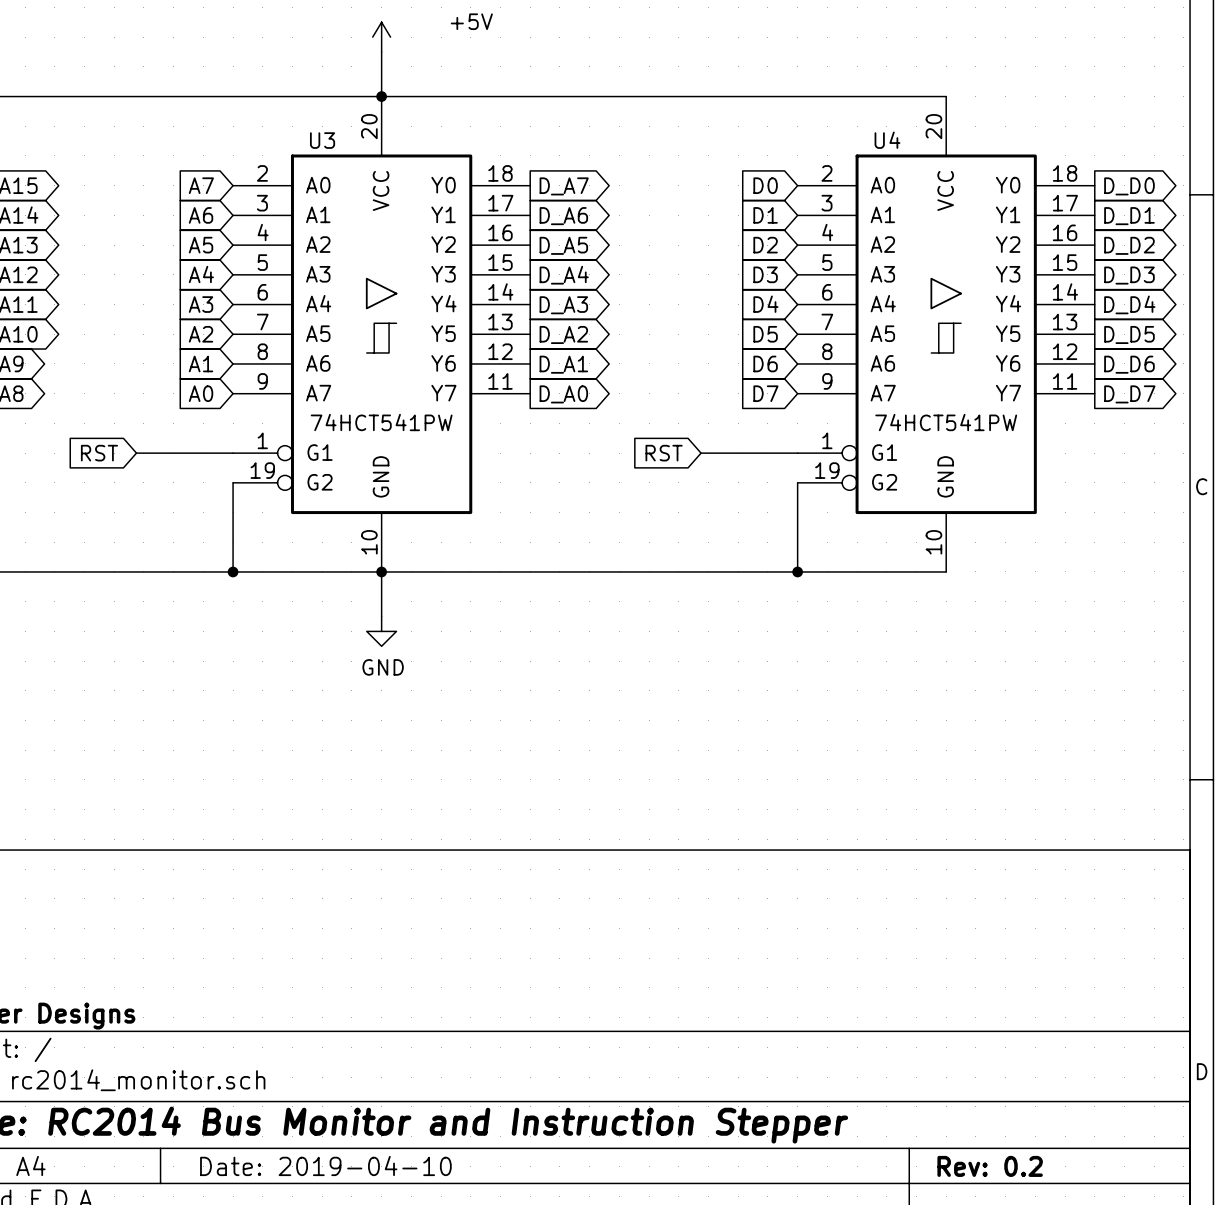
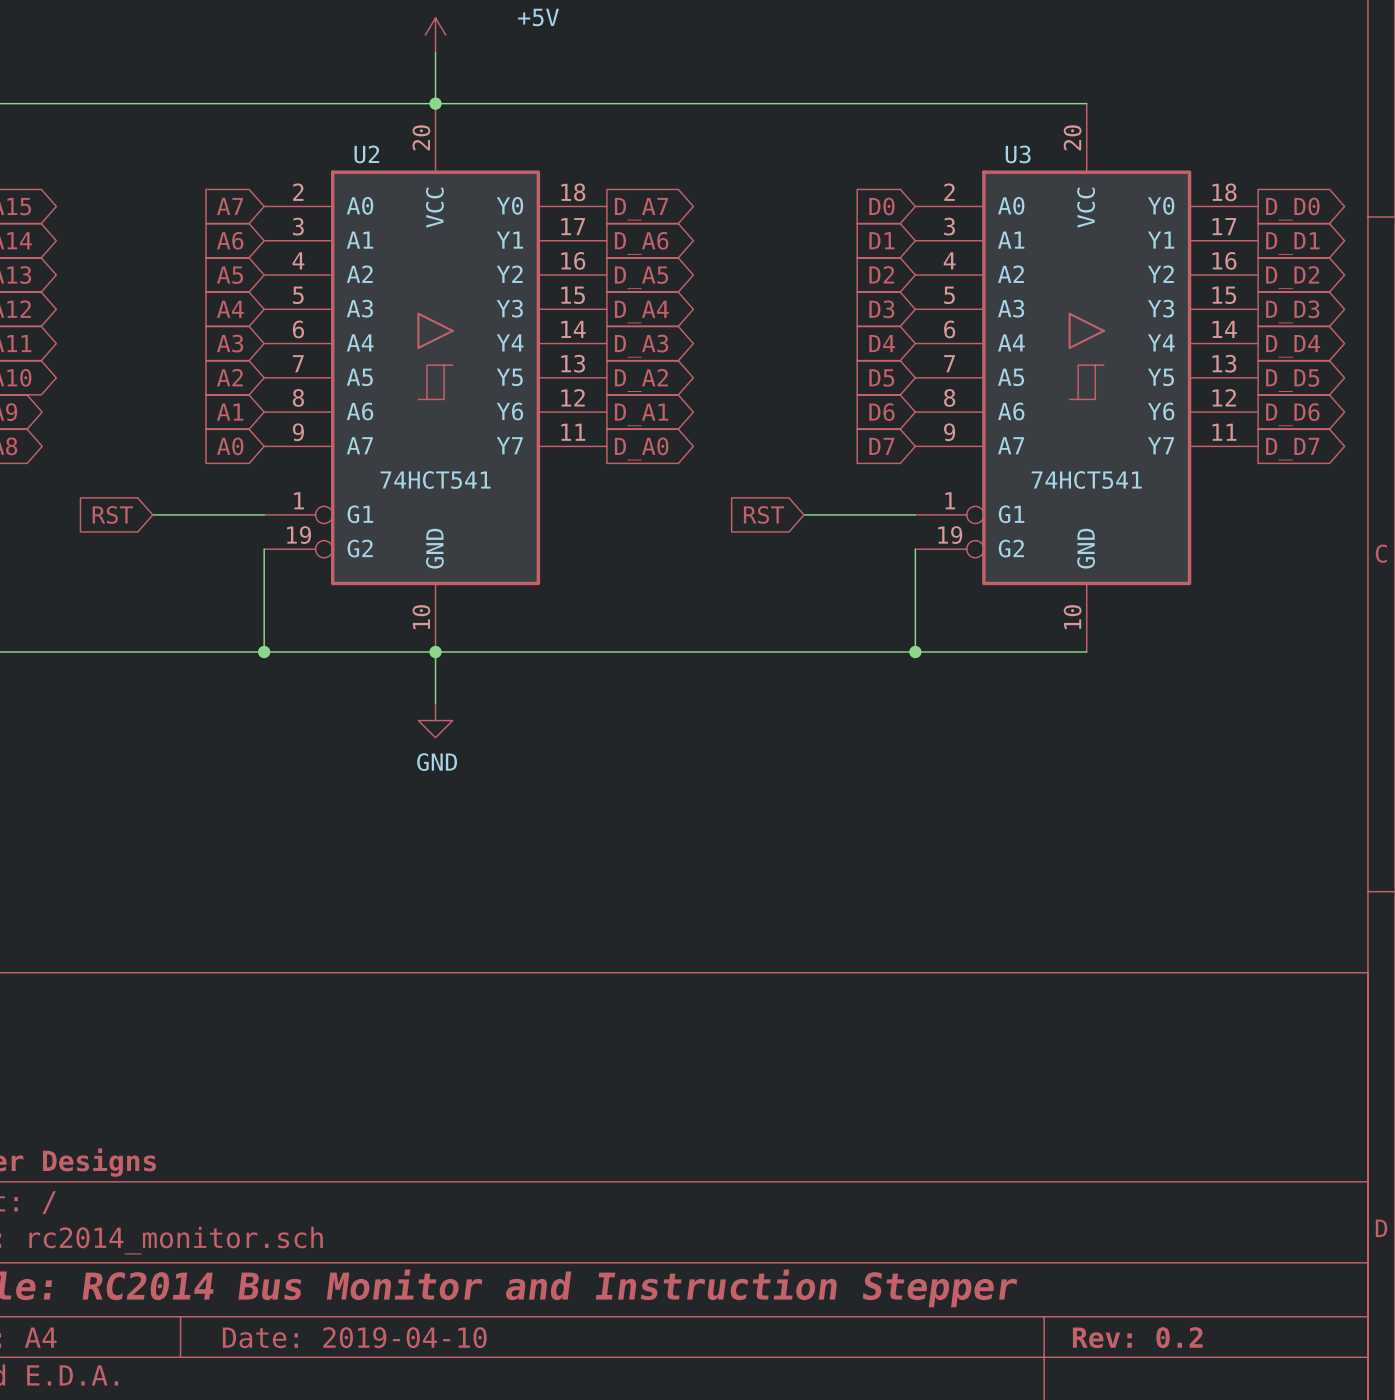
U3 name: U3 (322, 140) -> U2 (366, 154)
U4 name: U4 (887, 140) -> U3 (1018, 154)
U3 value: 74HCT541PW (381, 422) -> 74HCT541 (435, 480)
U4 value: 74HCT541PW (946, 422) -> 74HCT541 (1086, 480)

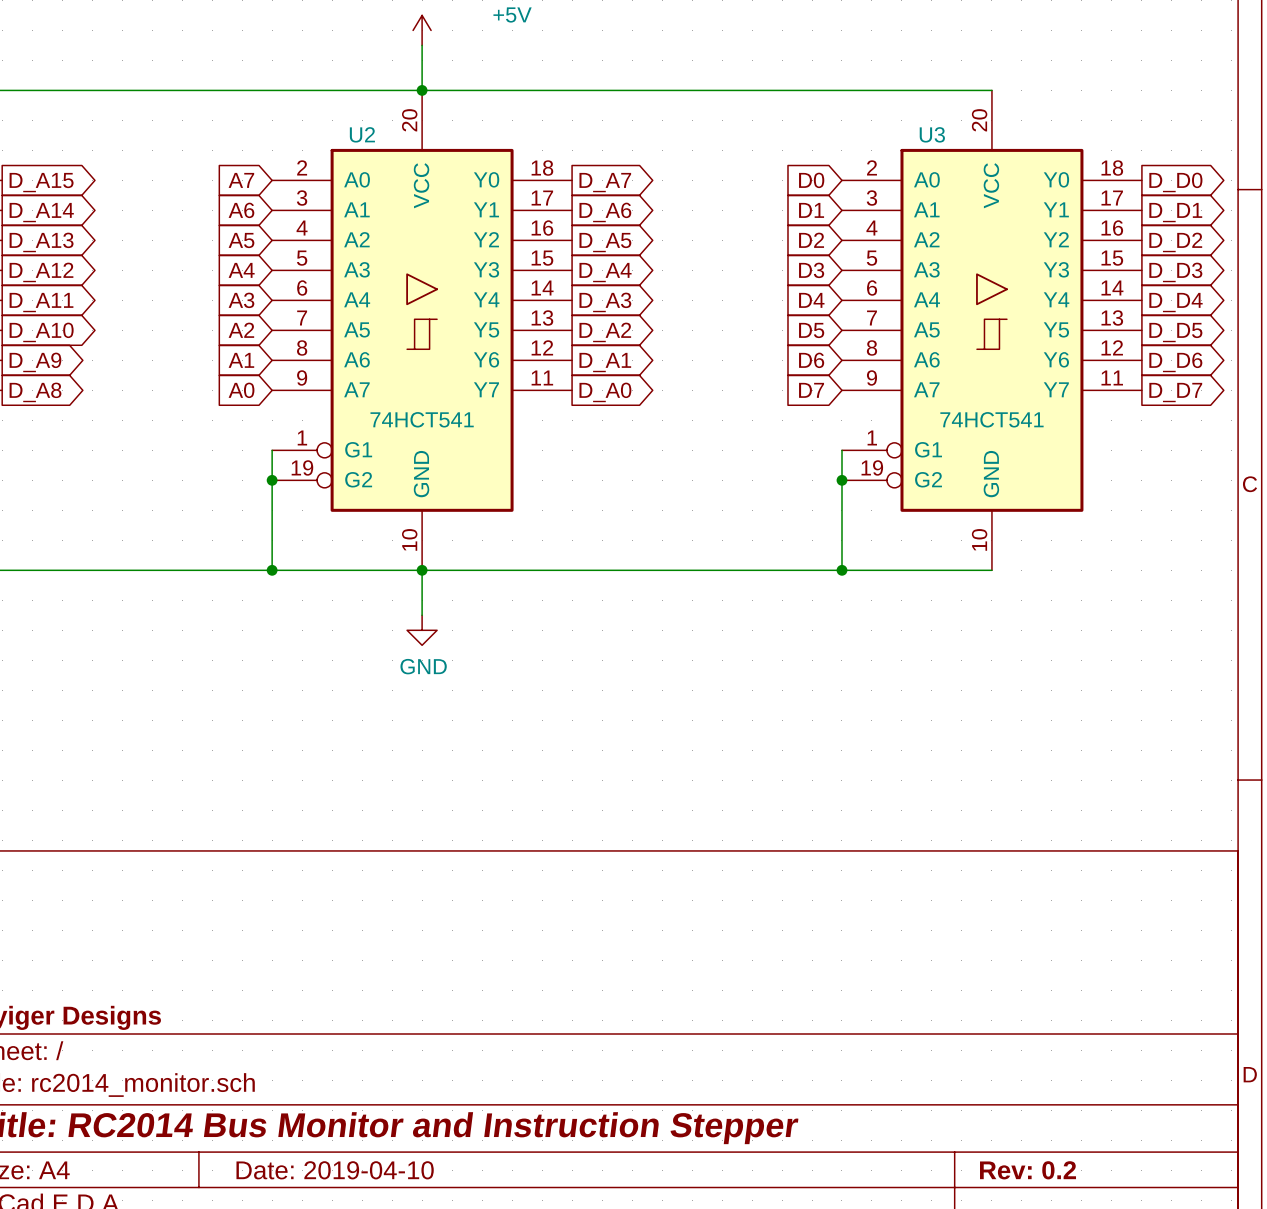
global label: RST (112, 514) -> none
wire: (152, 514) (264, 514) -> (272, 480) (272, 450)
global label: RST (764, 514) -> none
wire: (803, 514) (915, 514) -> (841, 480) (841, 450)
junction: none -> (272, 480)
junction: none -> (841, 480)

